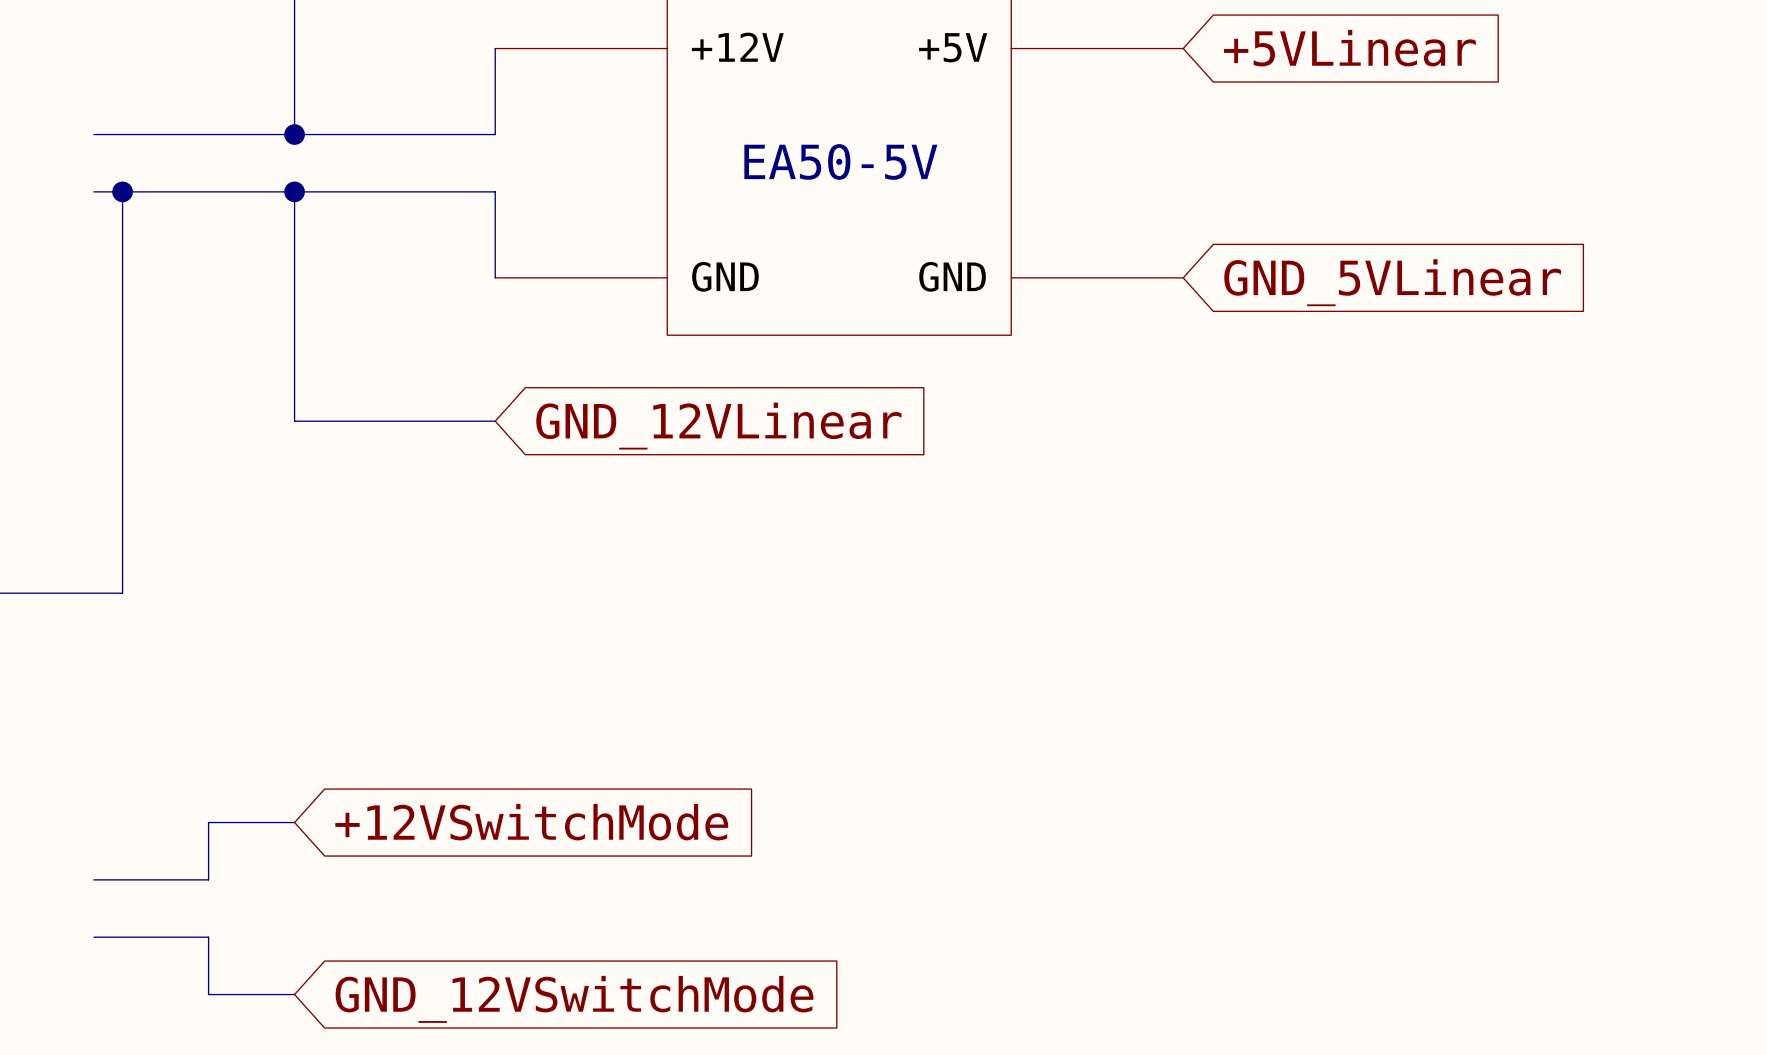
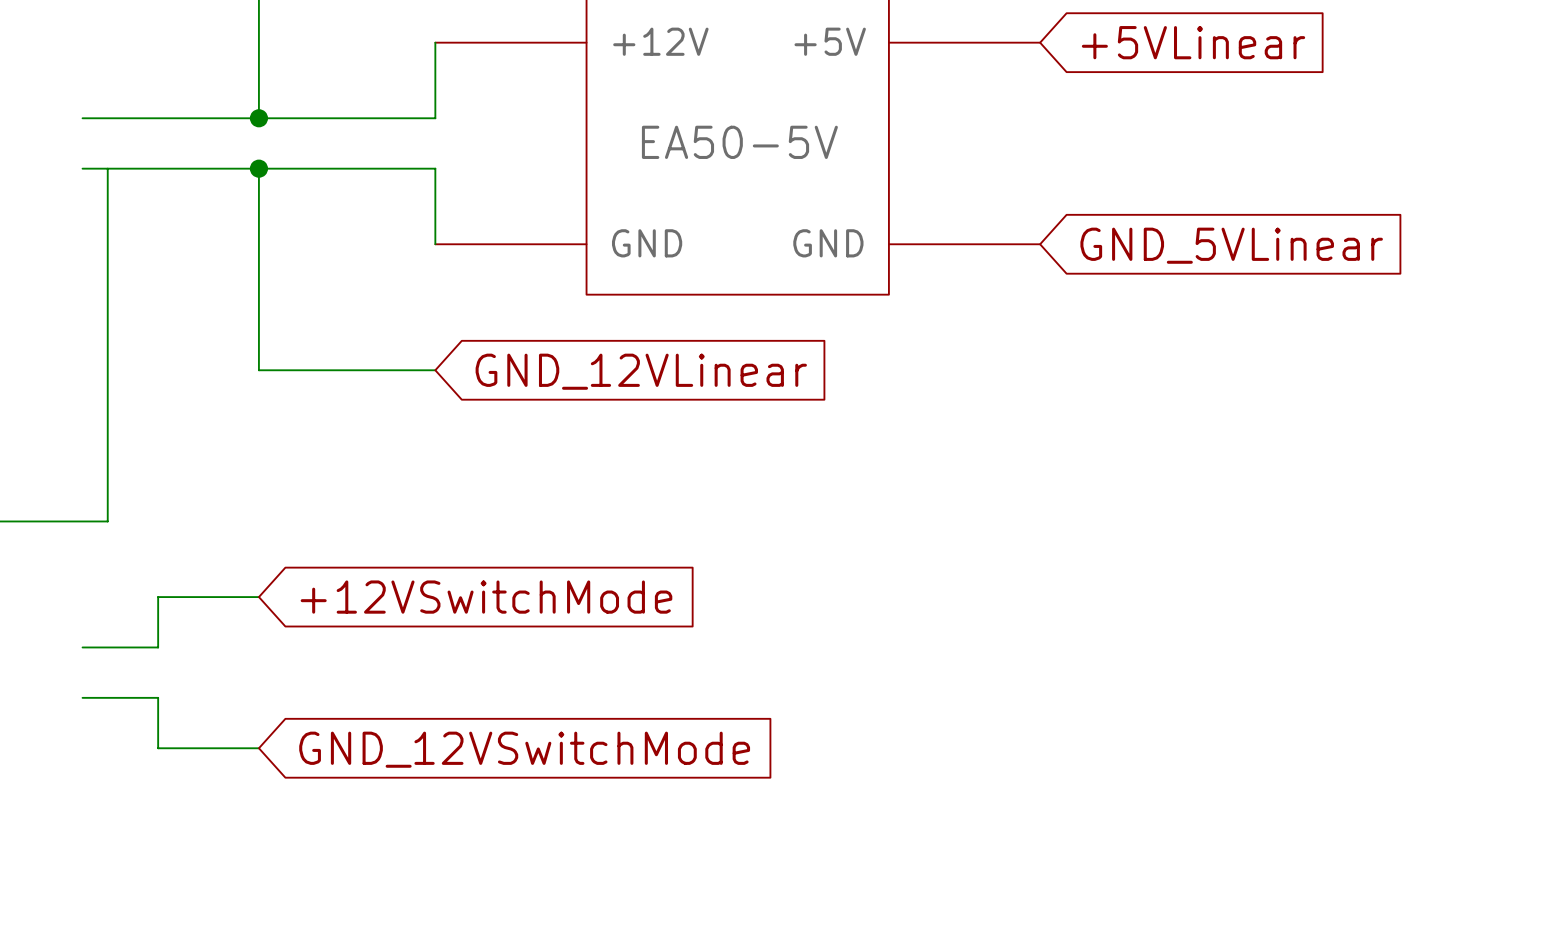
junction: (122, 191) -> none
wire: none -> (258, 597) (158, 597) (158, 647) (82, 647)
wire: none -> (82, 697) (158, 697) (158, 748) (258, 748)
wire: (294, 822) (208, 822) (208, 879) (93, 879) -> none
global label position: +12VSwitchMode (531, 822) -> +12VSwitchMode (486, 597)
wire: (93, 937) (208, 937) (208, 994) (294, 994) -> none
global label position: GND_12VSwitchMode (574, 999) -> GND_12VSwitchMode (524, 749)

